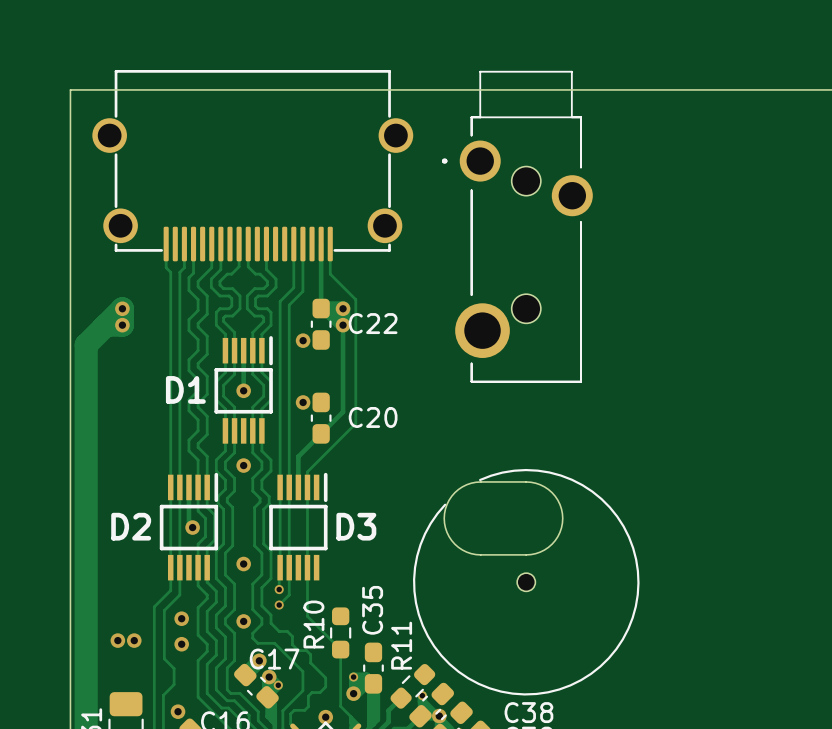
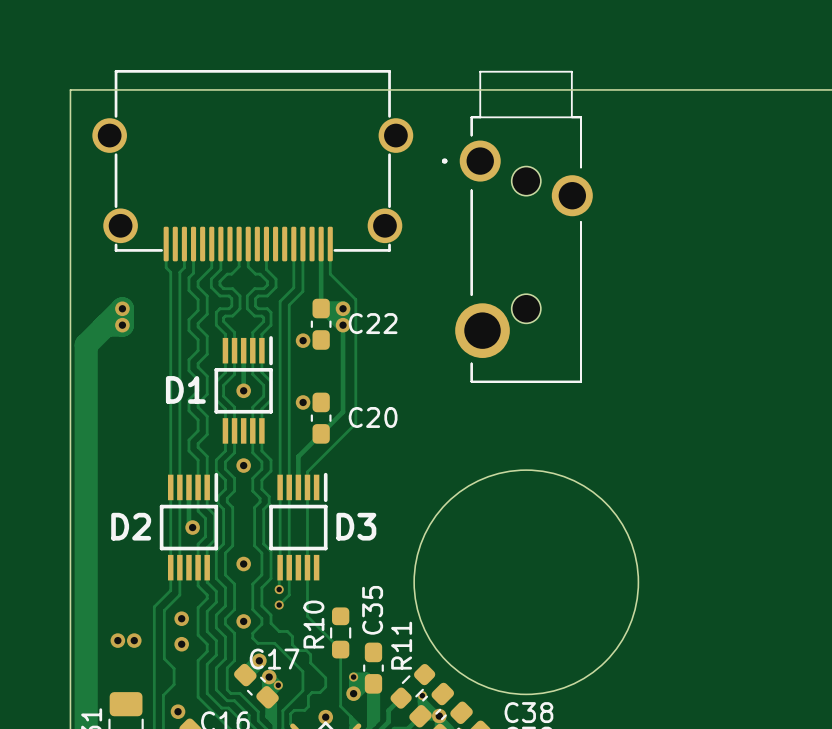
round board edge: none -> [413, 469, 639, 695]
line: (480, 479) (514, 470) (537, 470) (560, 475) (582, 485) (601, 499) (623, 526) (633, 548) (637, 571) (635, 606) (622, 639) (608, 658) (591, 673) (559, 689) (536, 693) (512, 693) (489, 688) (468, 678) (441, 655) (427, 636) (418, 614) (414, 579) (420, 544) (430, 523) (445, 504) -> none
board edge: (480, 481) (531, 482) (548, 489) (557, 500) (562, 513) (561, 527) (555, 540) (544, 550) (531, 554) (475, 554) (458, 547) (449, 536) (445, 527) (444, 518) (447, 504) (458, 489) (471, 483) (480, 481) -> none
part: (526, 582) -> none

